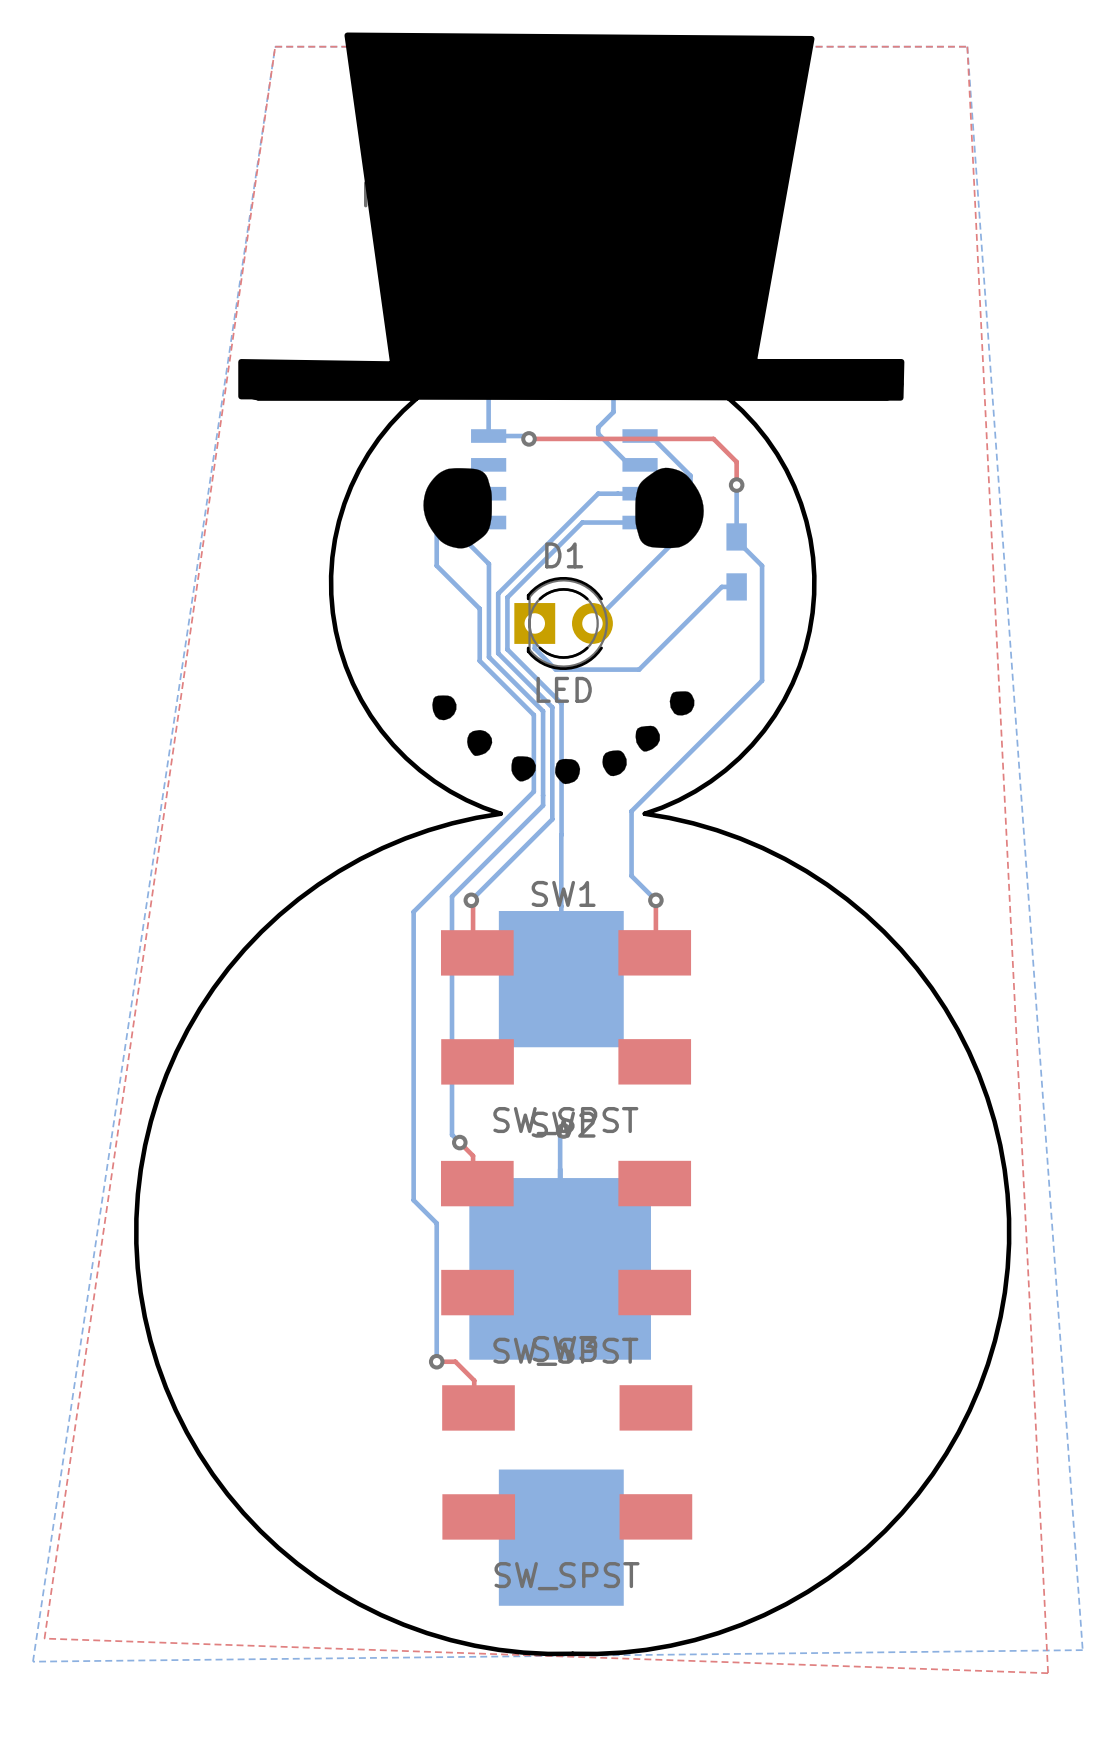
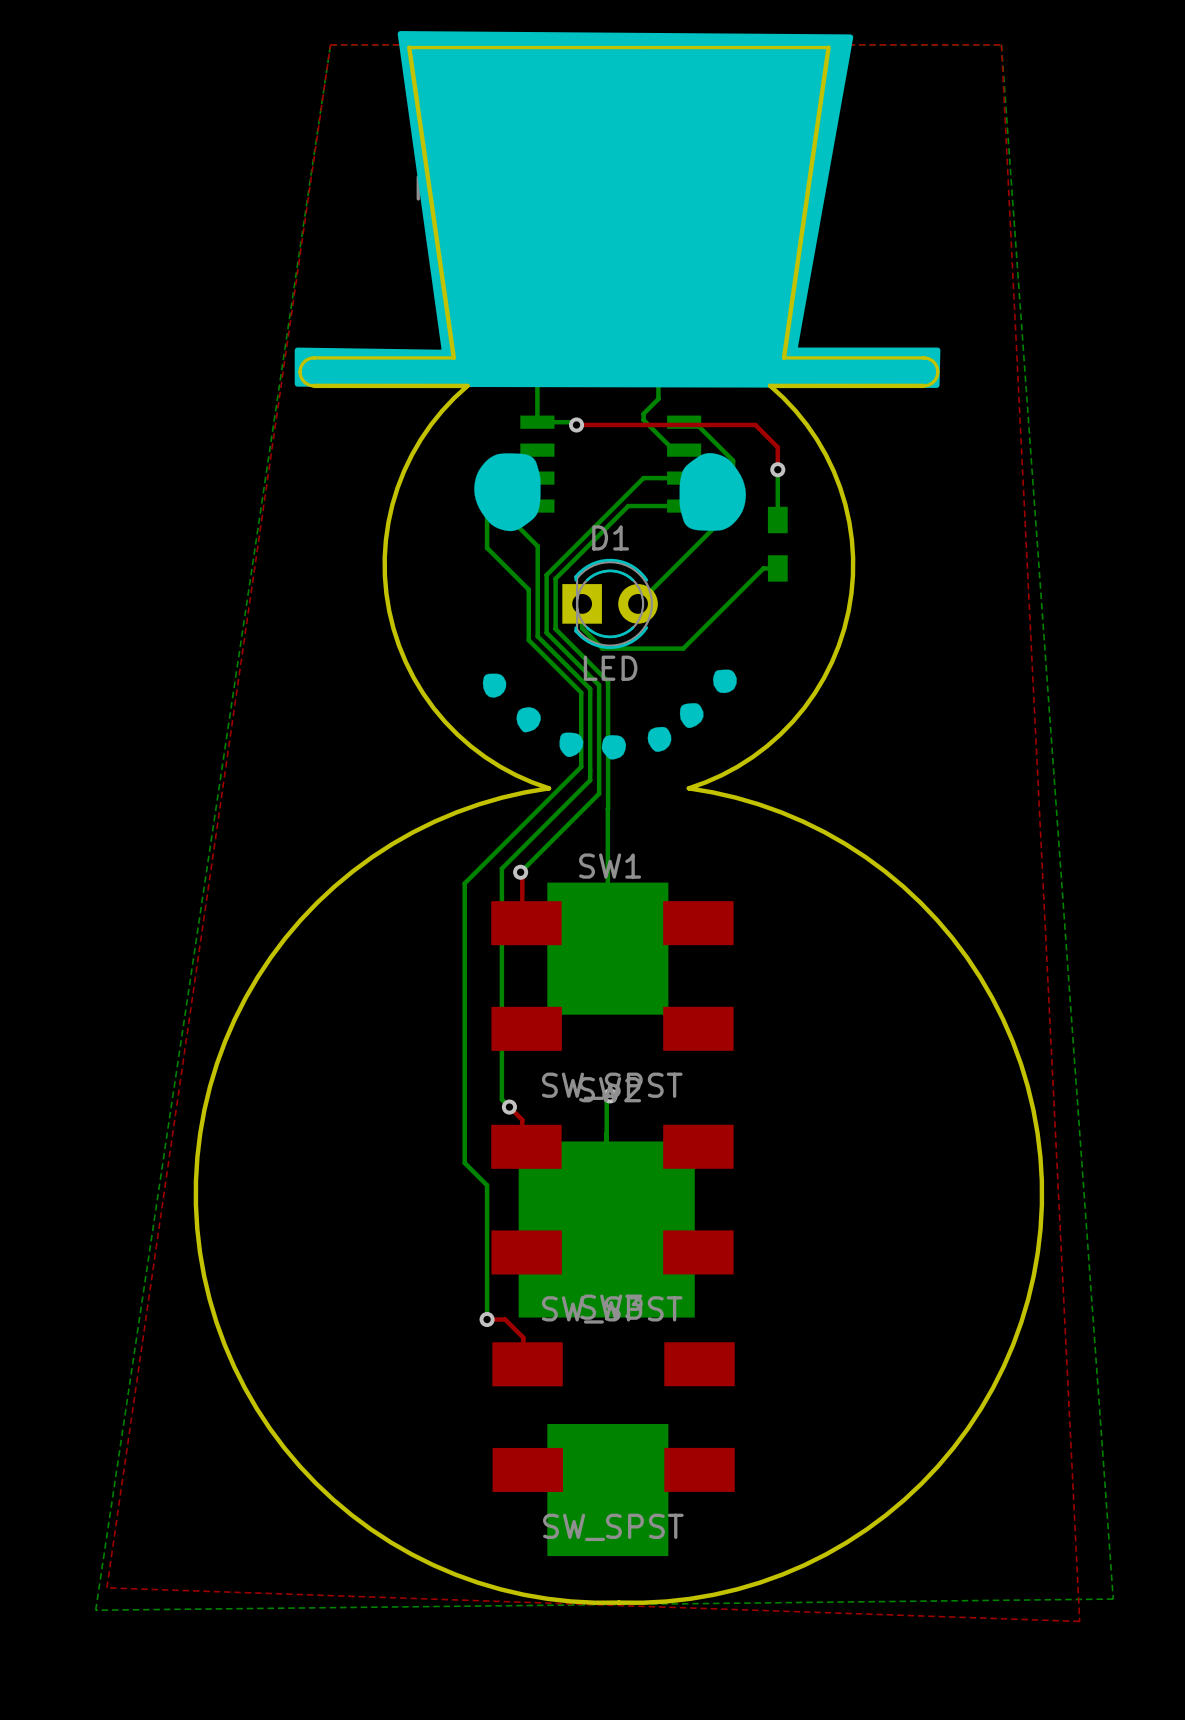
bottom track: (736, 540) (762, 565) (762, 680) (631, 811) (631, 875) (655, 900) -> none
top track: (655, 900) (655, 951) -> none
via: (655, 900) -> none

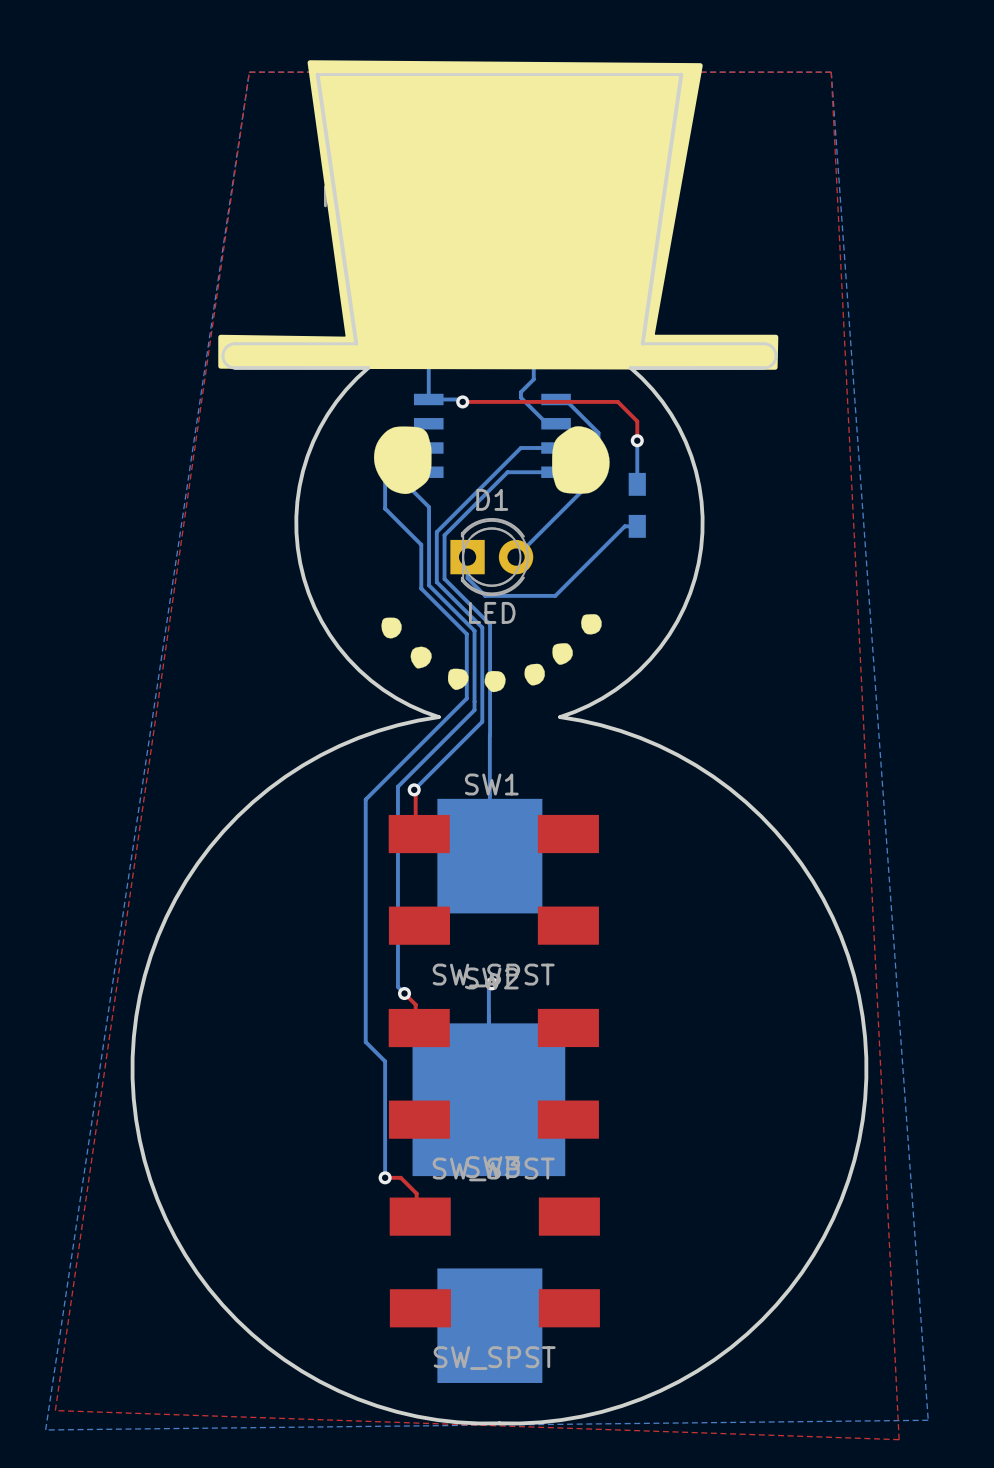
D1 footprint: [562, 558, 658, 649] -> [450, 518, 534, 597]

